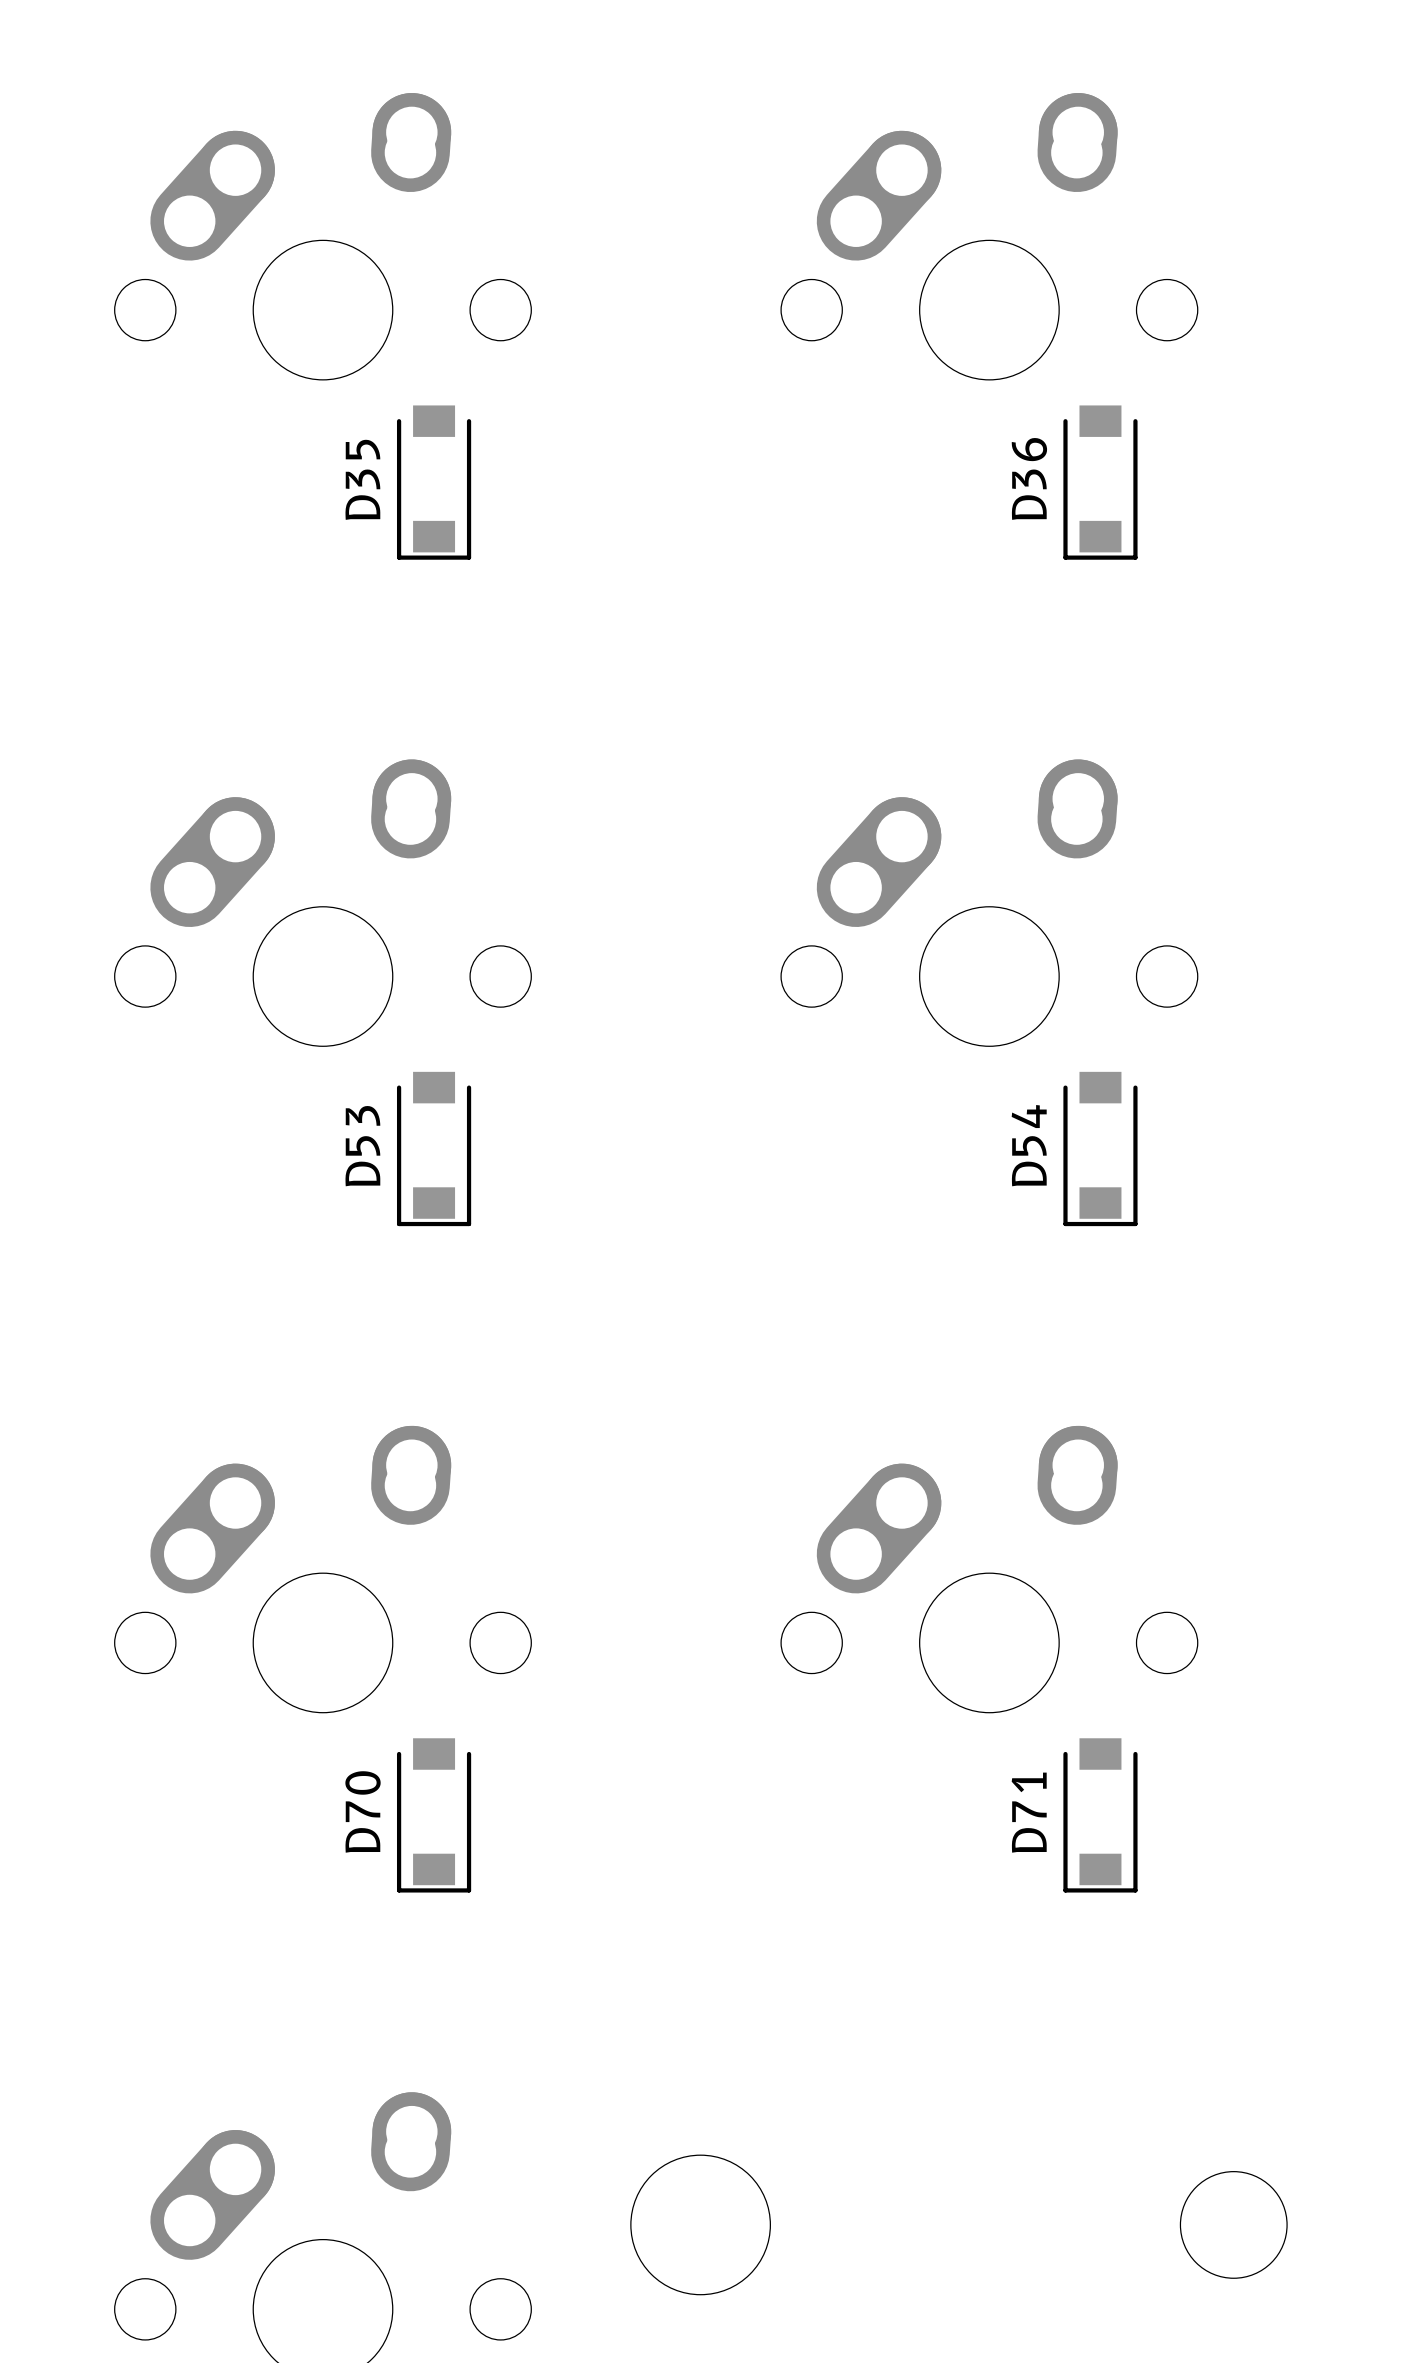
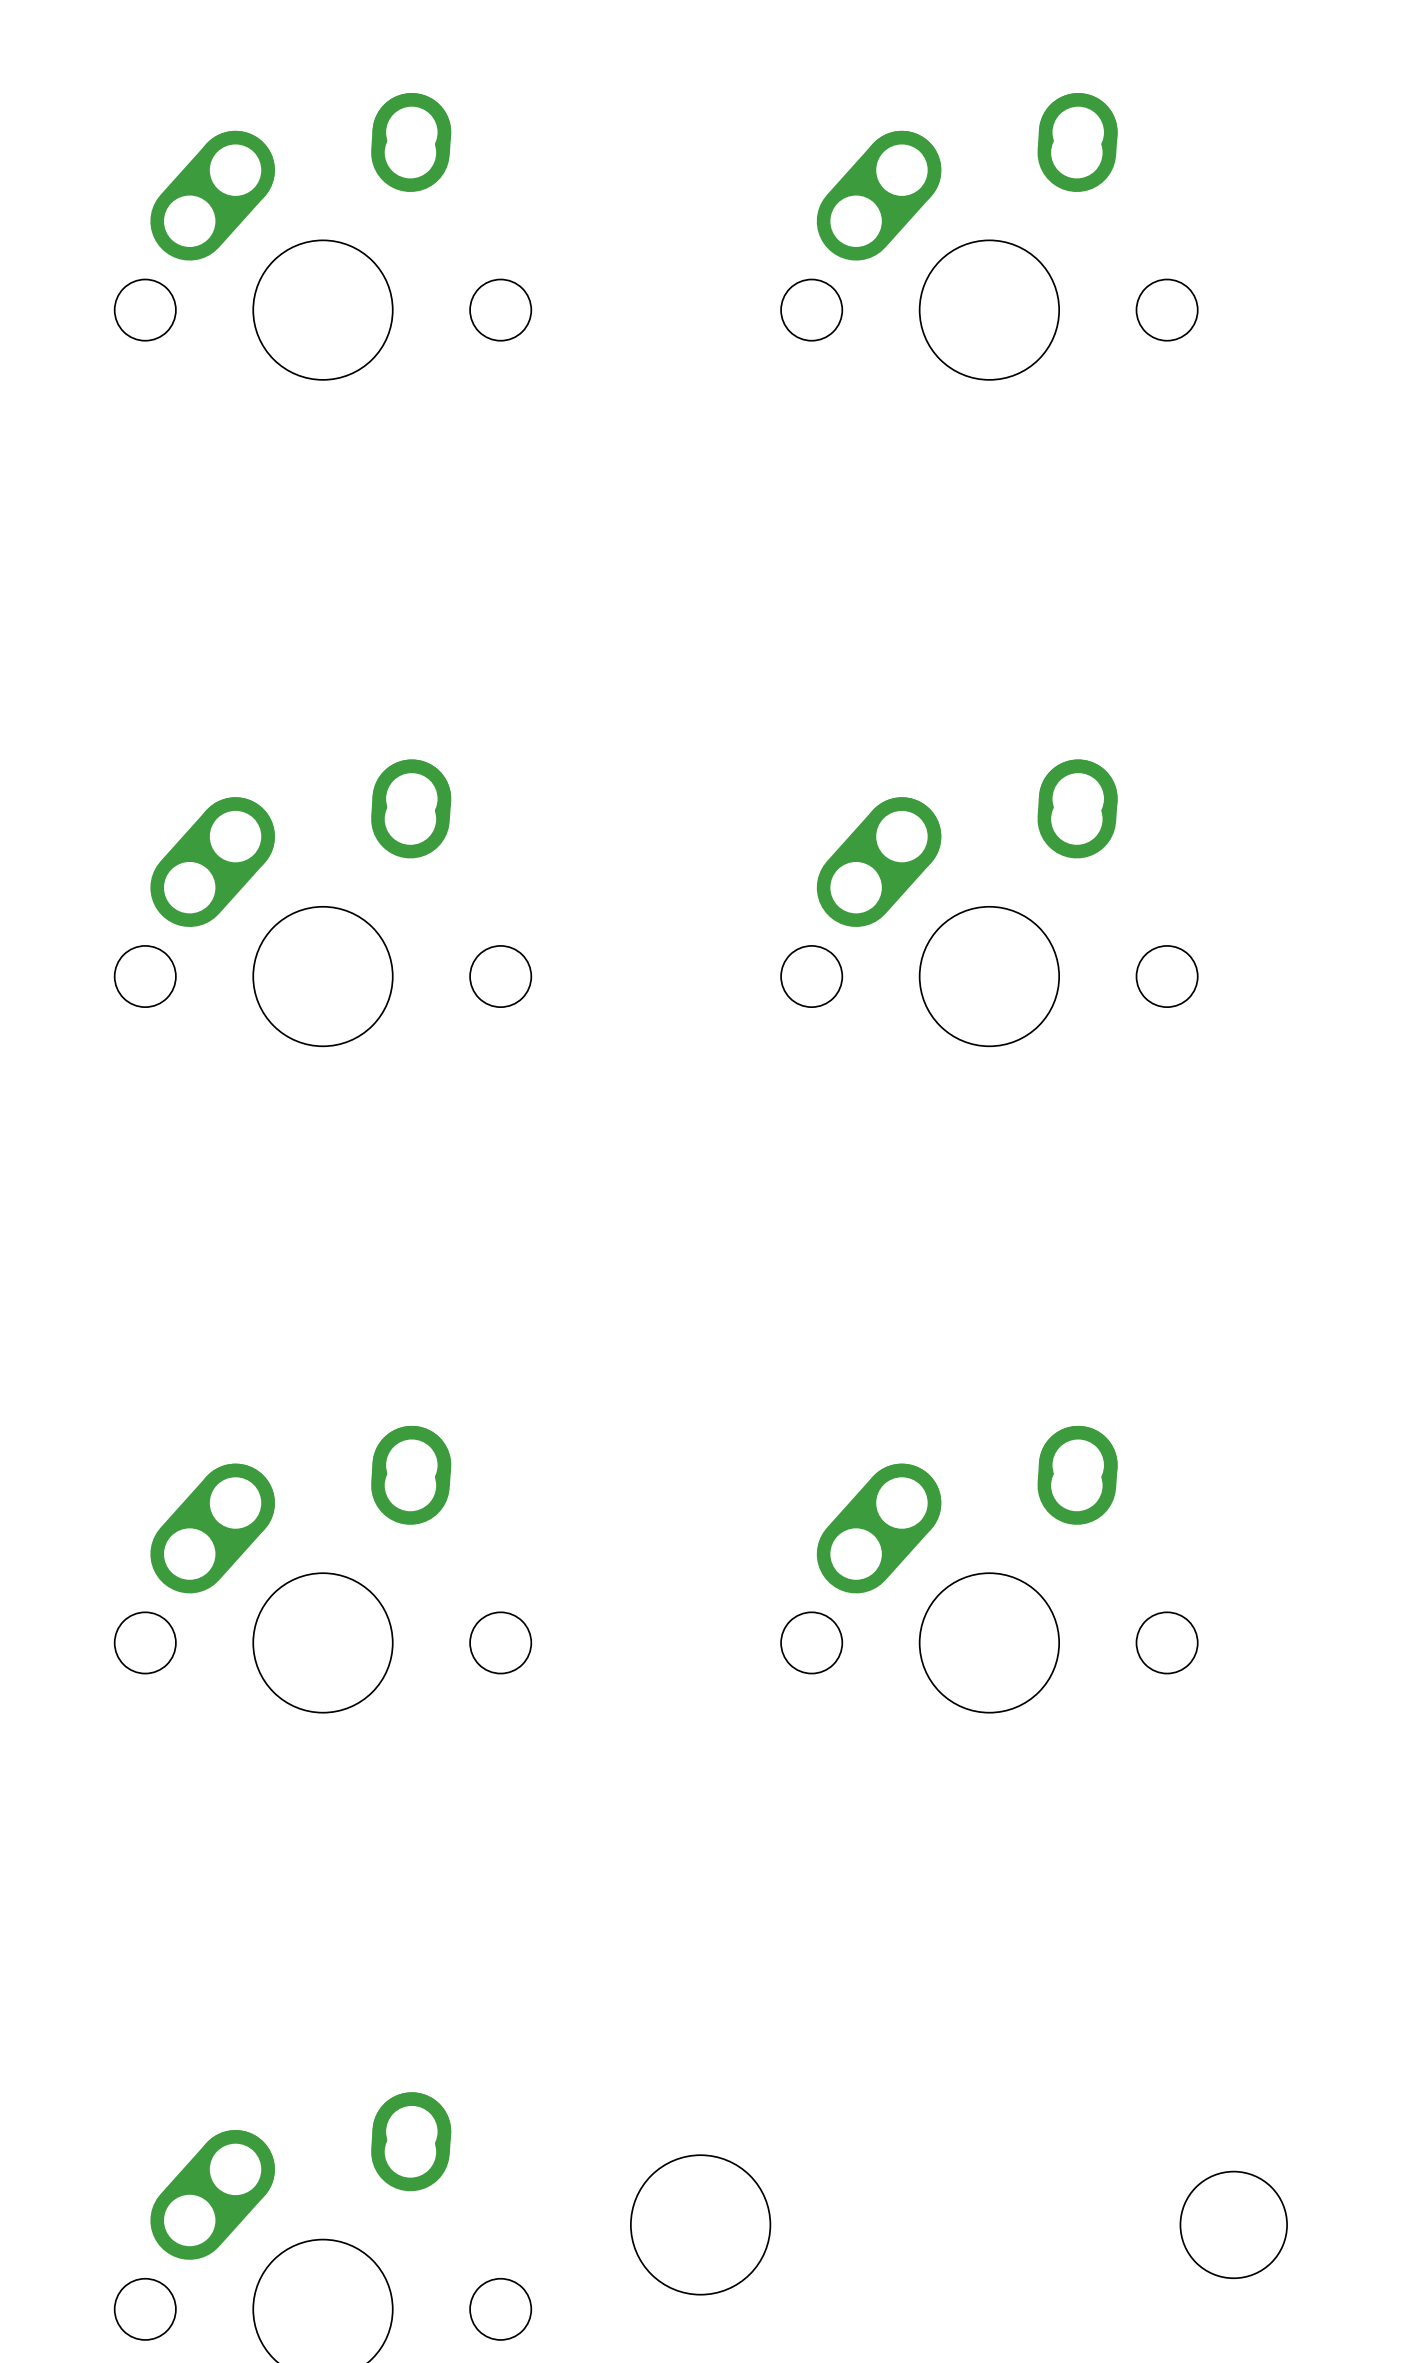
D35: (434, 482) -> none
D36: (1100, 482) -> none
D53: (434, 1148) -> none
D54: (1100, 1148) -> none
D70: (434, 1815) -> none
D71: (1100, 1815) -> none

